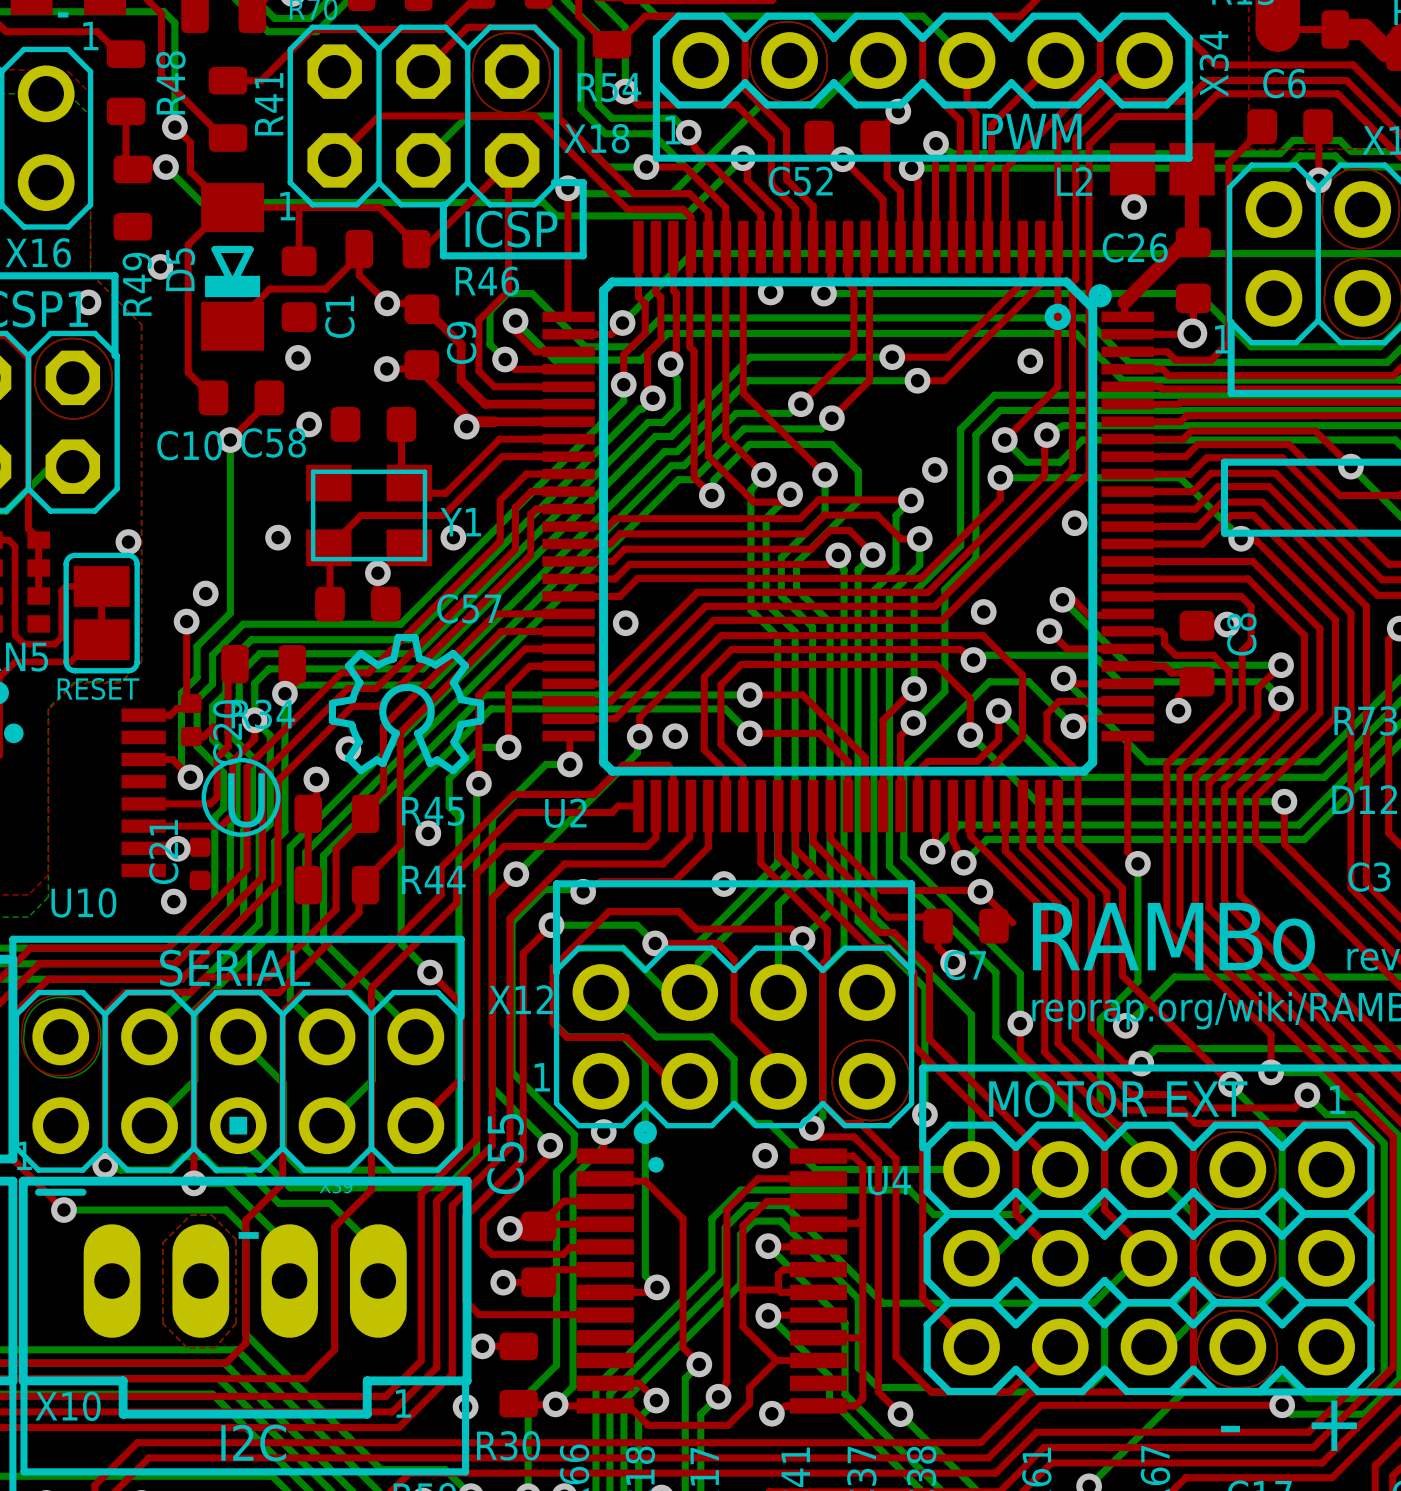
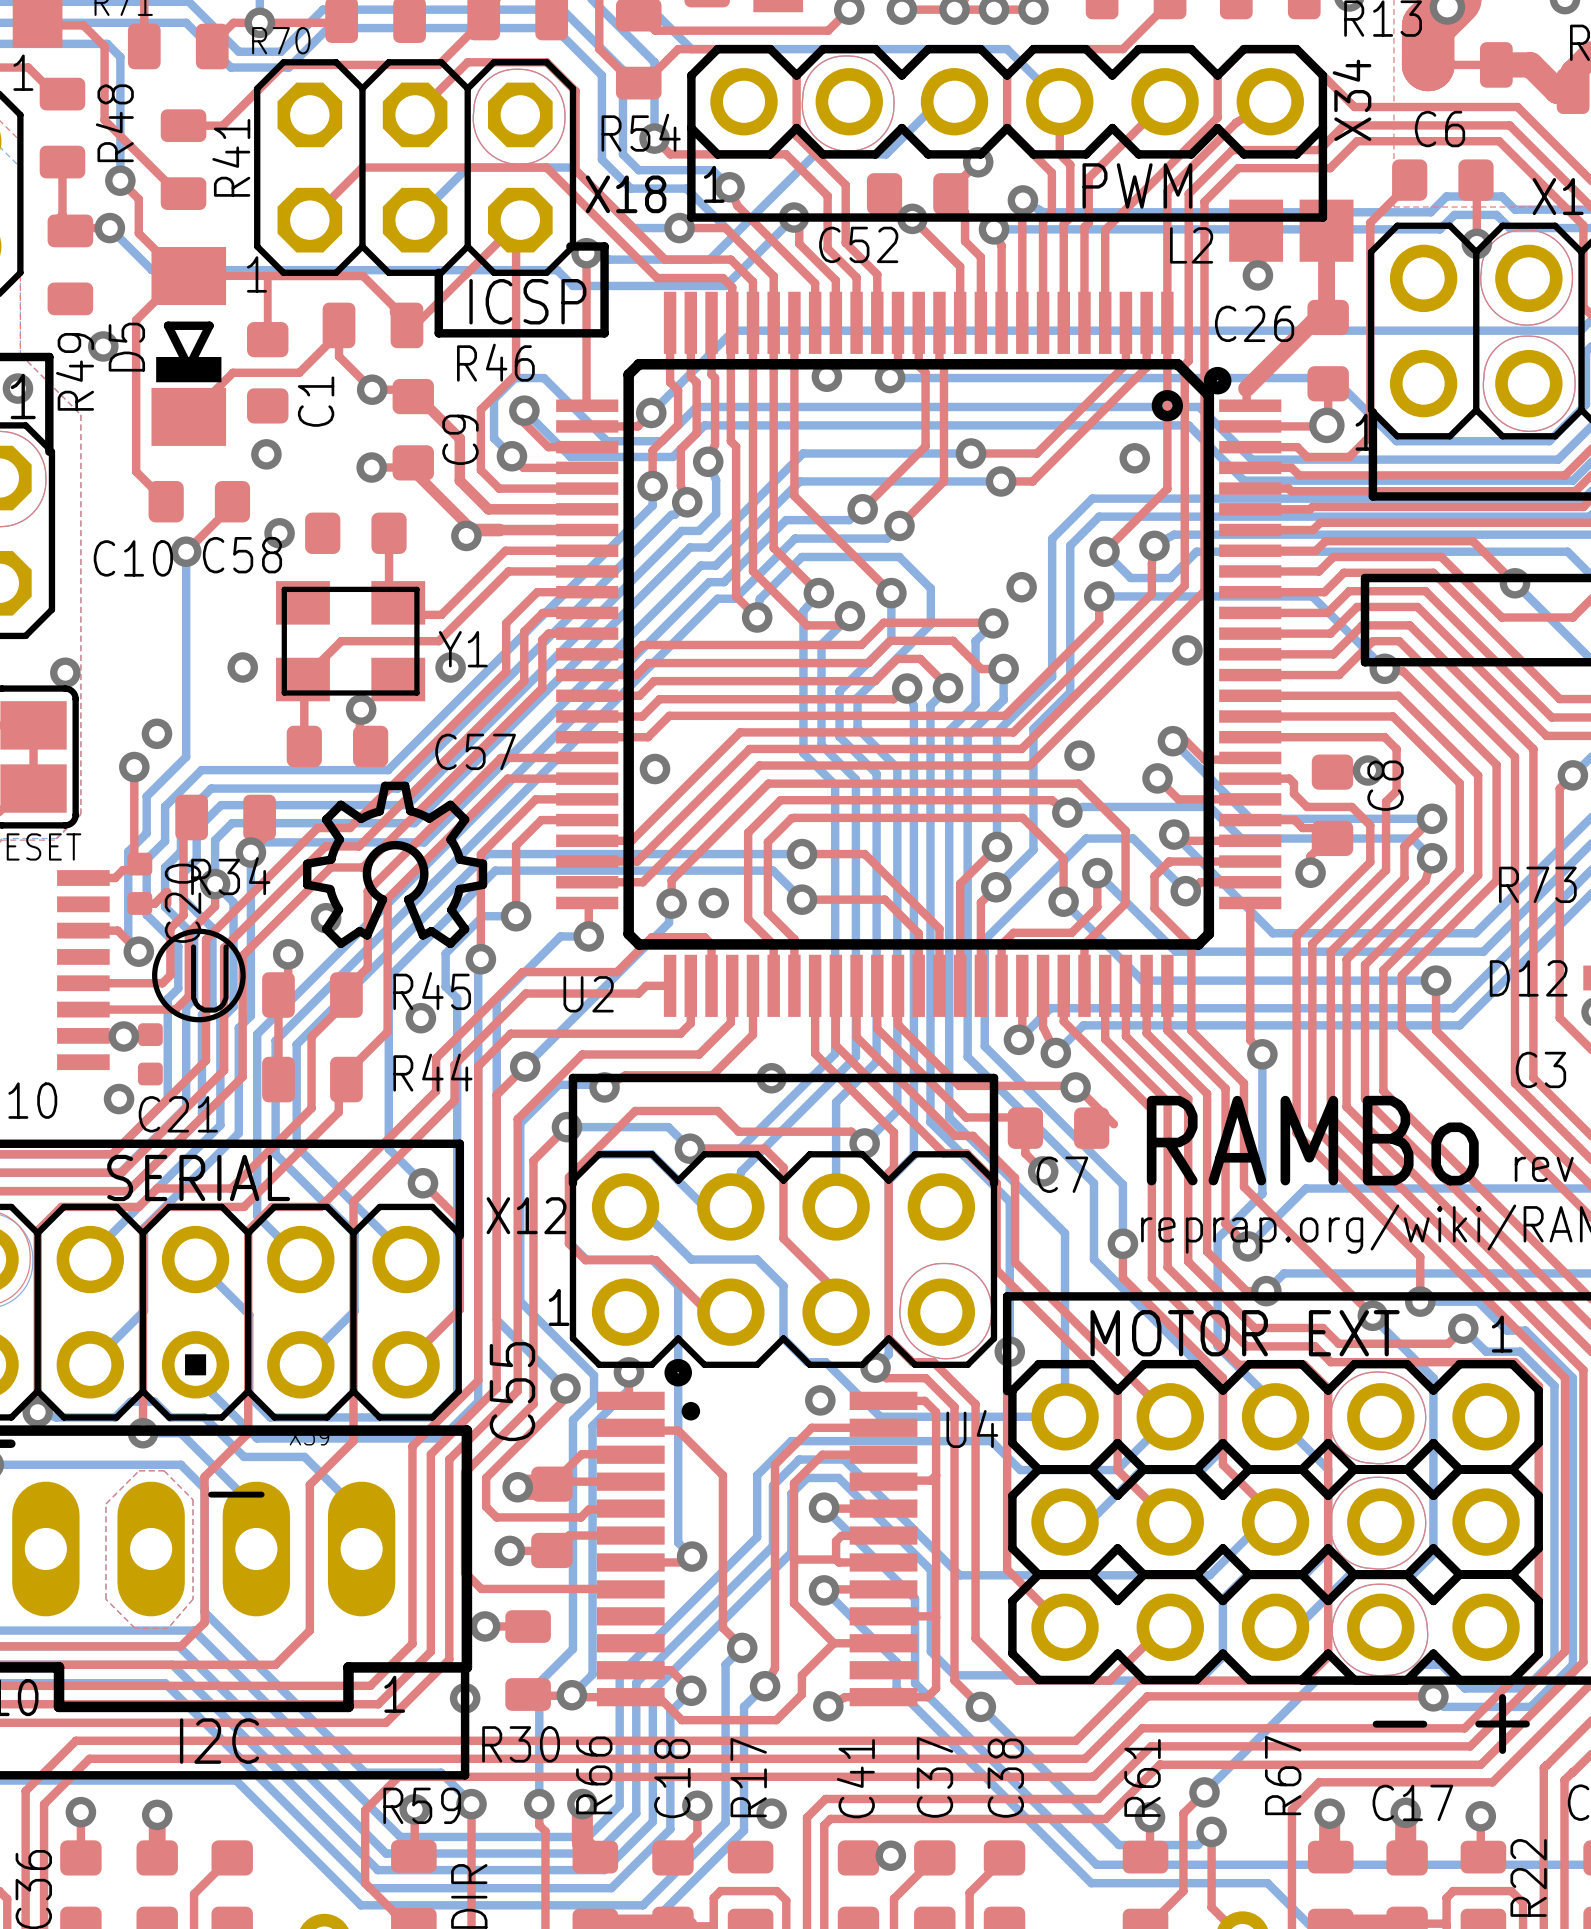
C21 name rotation: 0° (163, 852) -> 90° clockwise (178, 1114)
C21 name position: C21 (163, 852) -> C21 (178, 1114)

